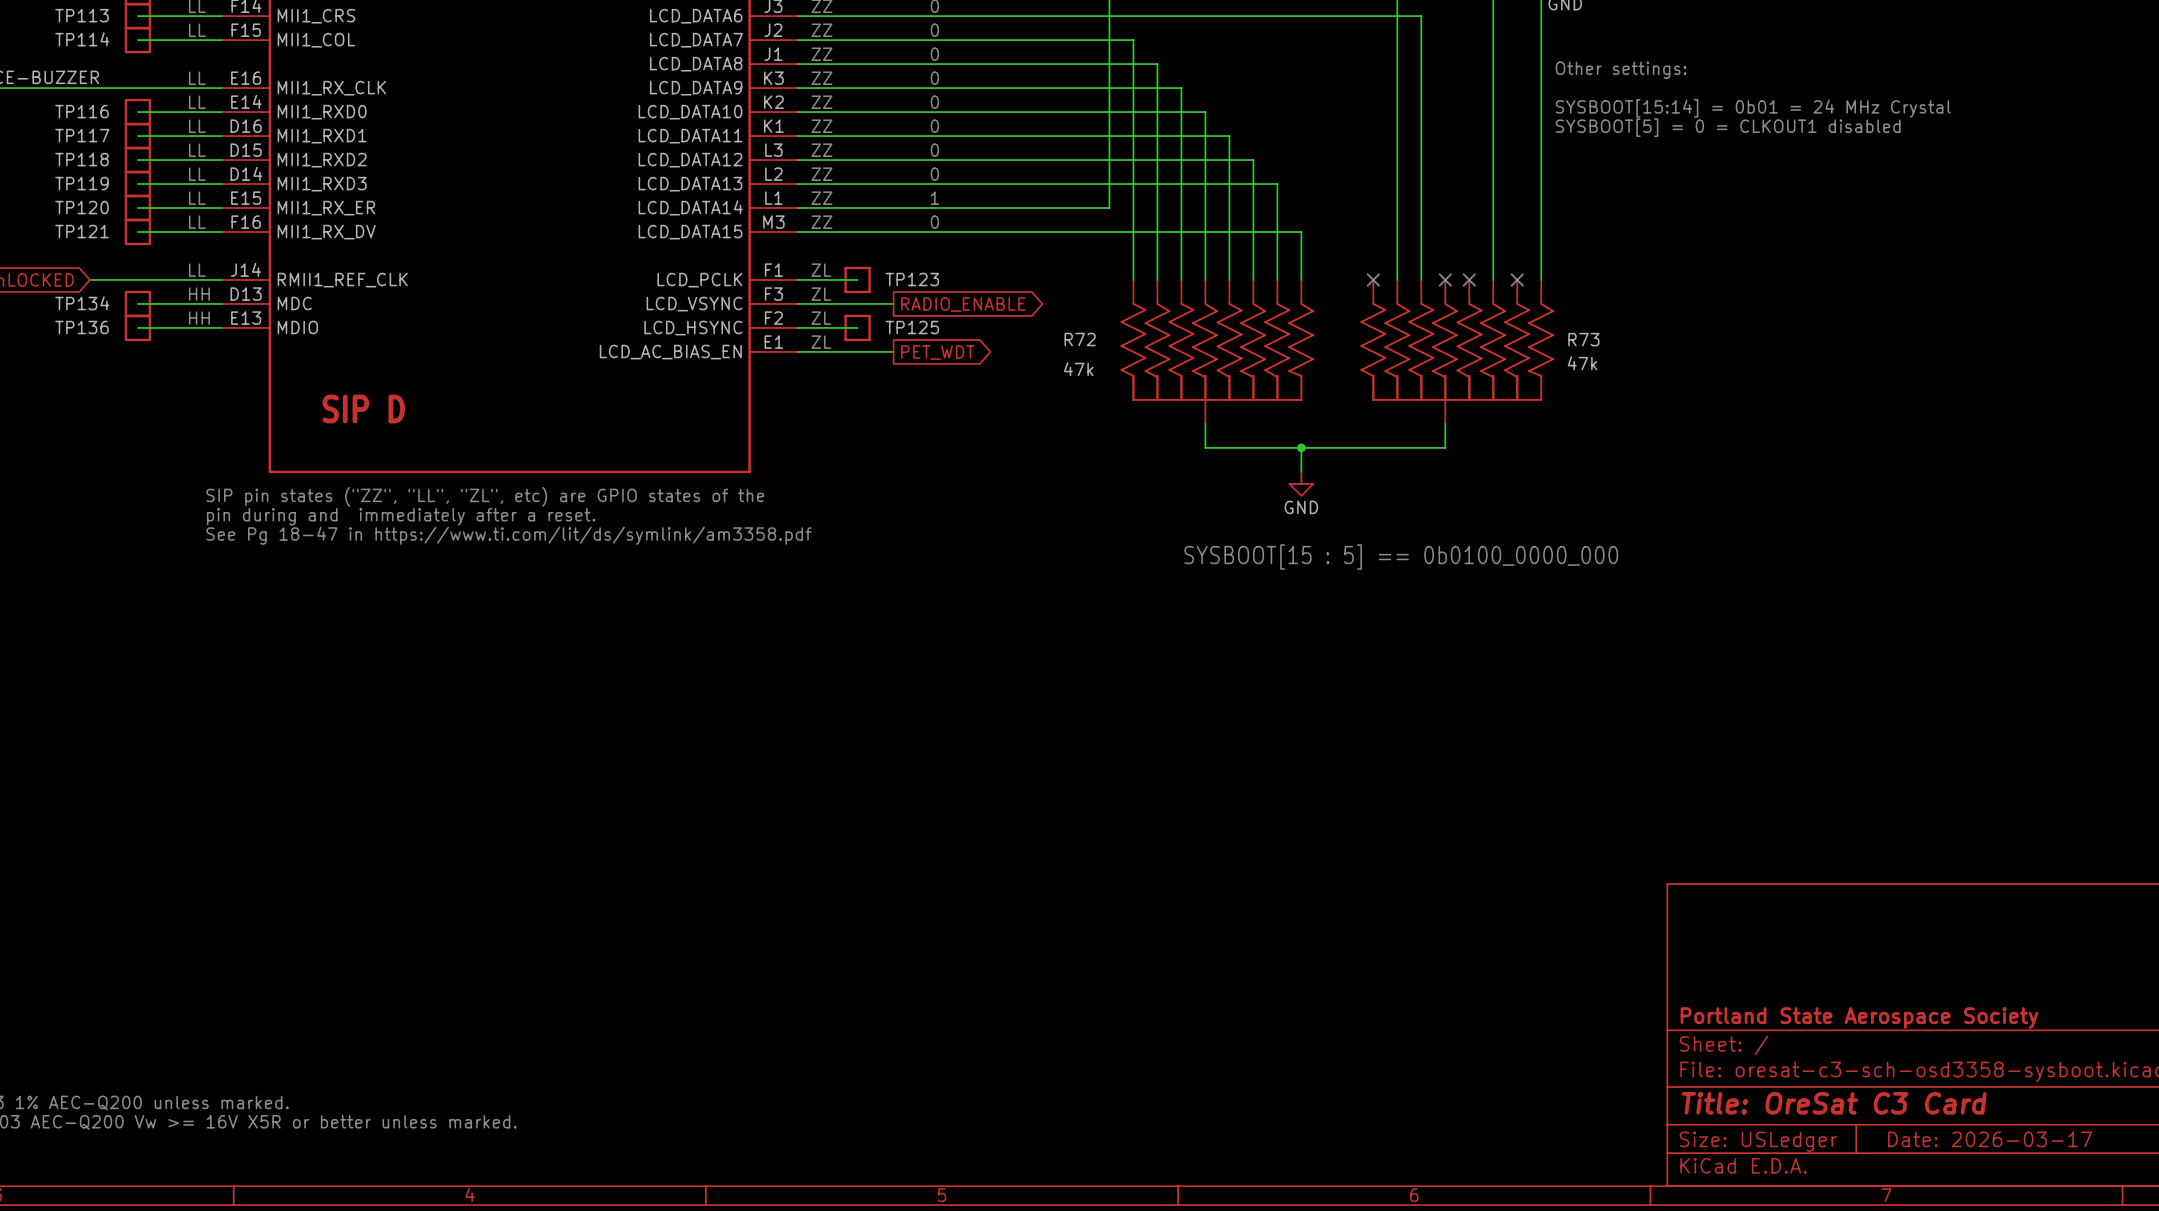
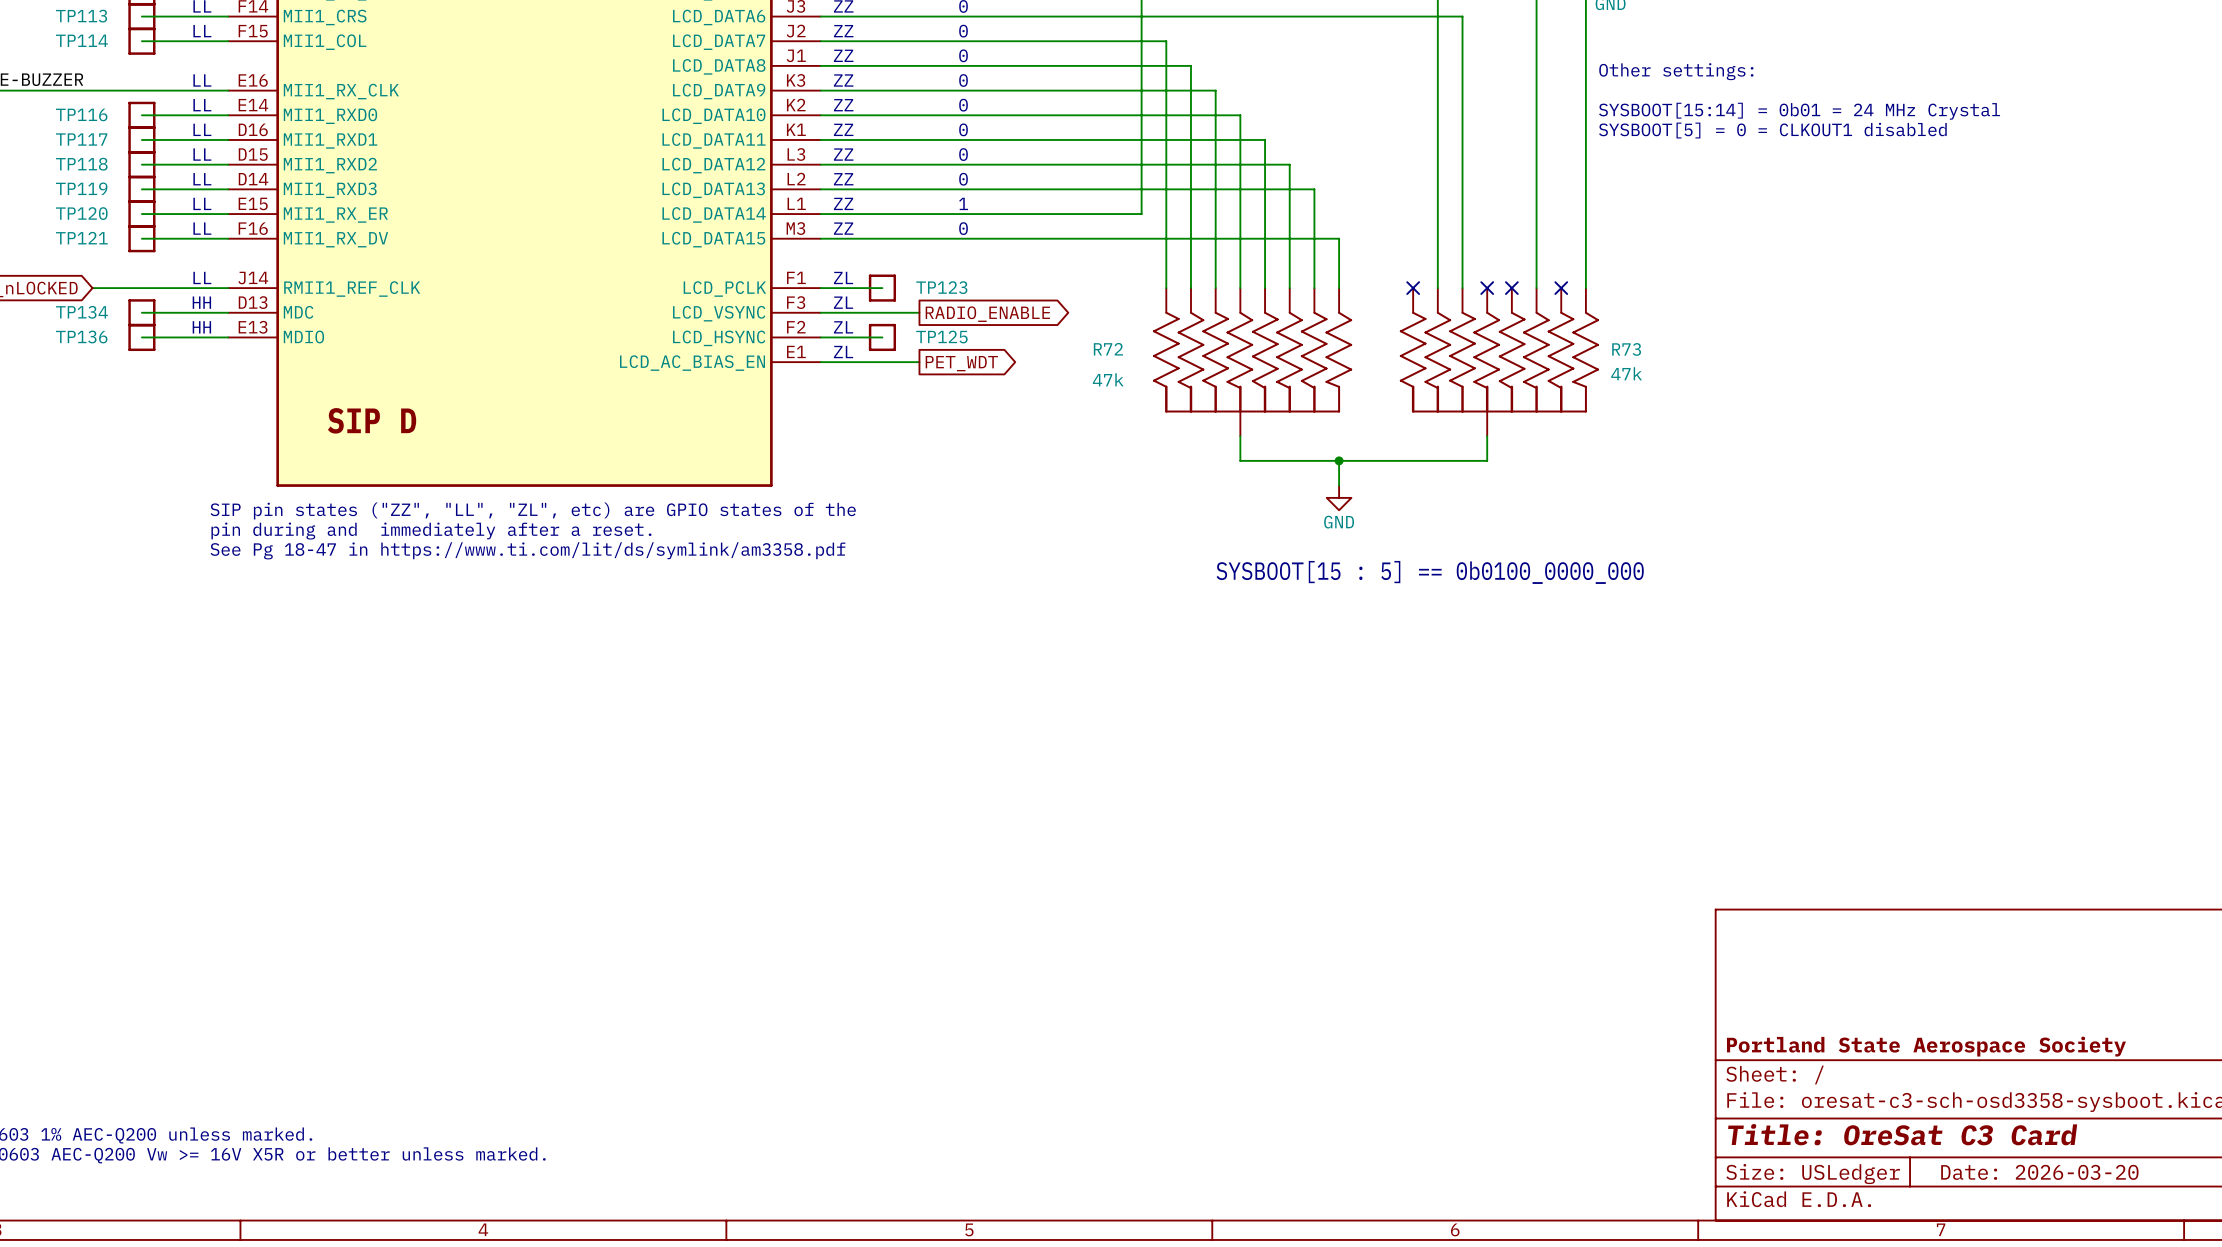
title block: Date: 2026-03-17 (1990, 1139) -> Date: 2026-03-20 (2039, 1172)

